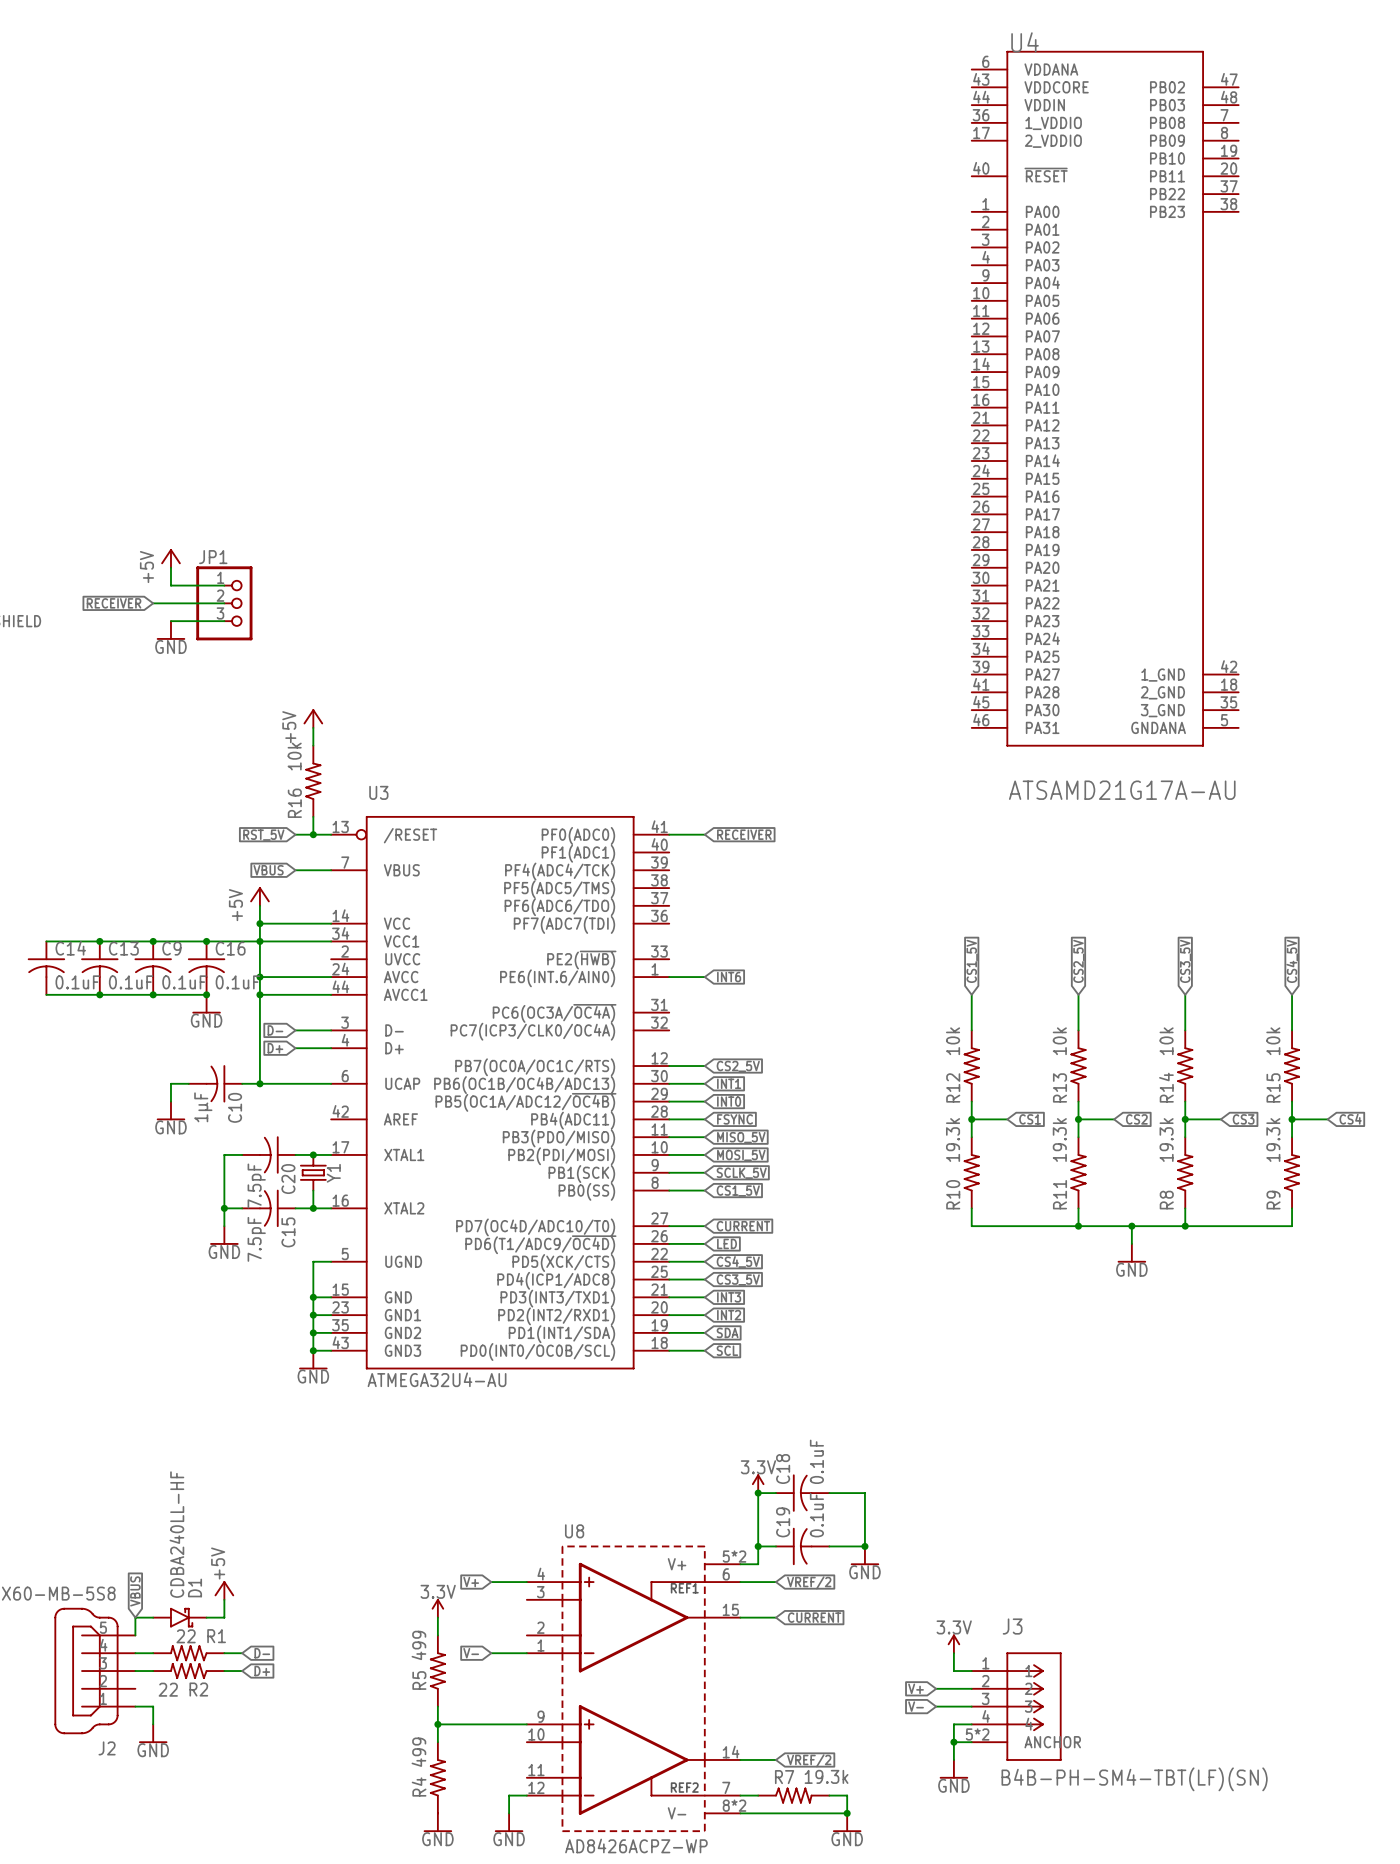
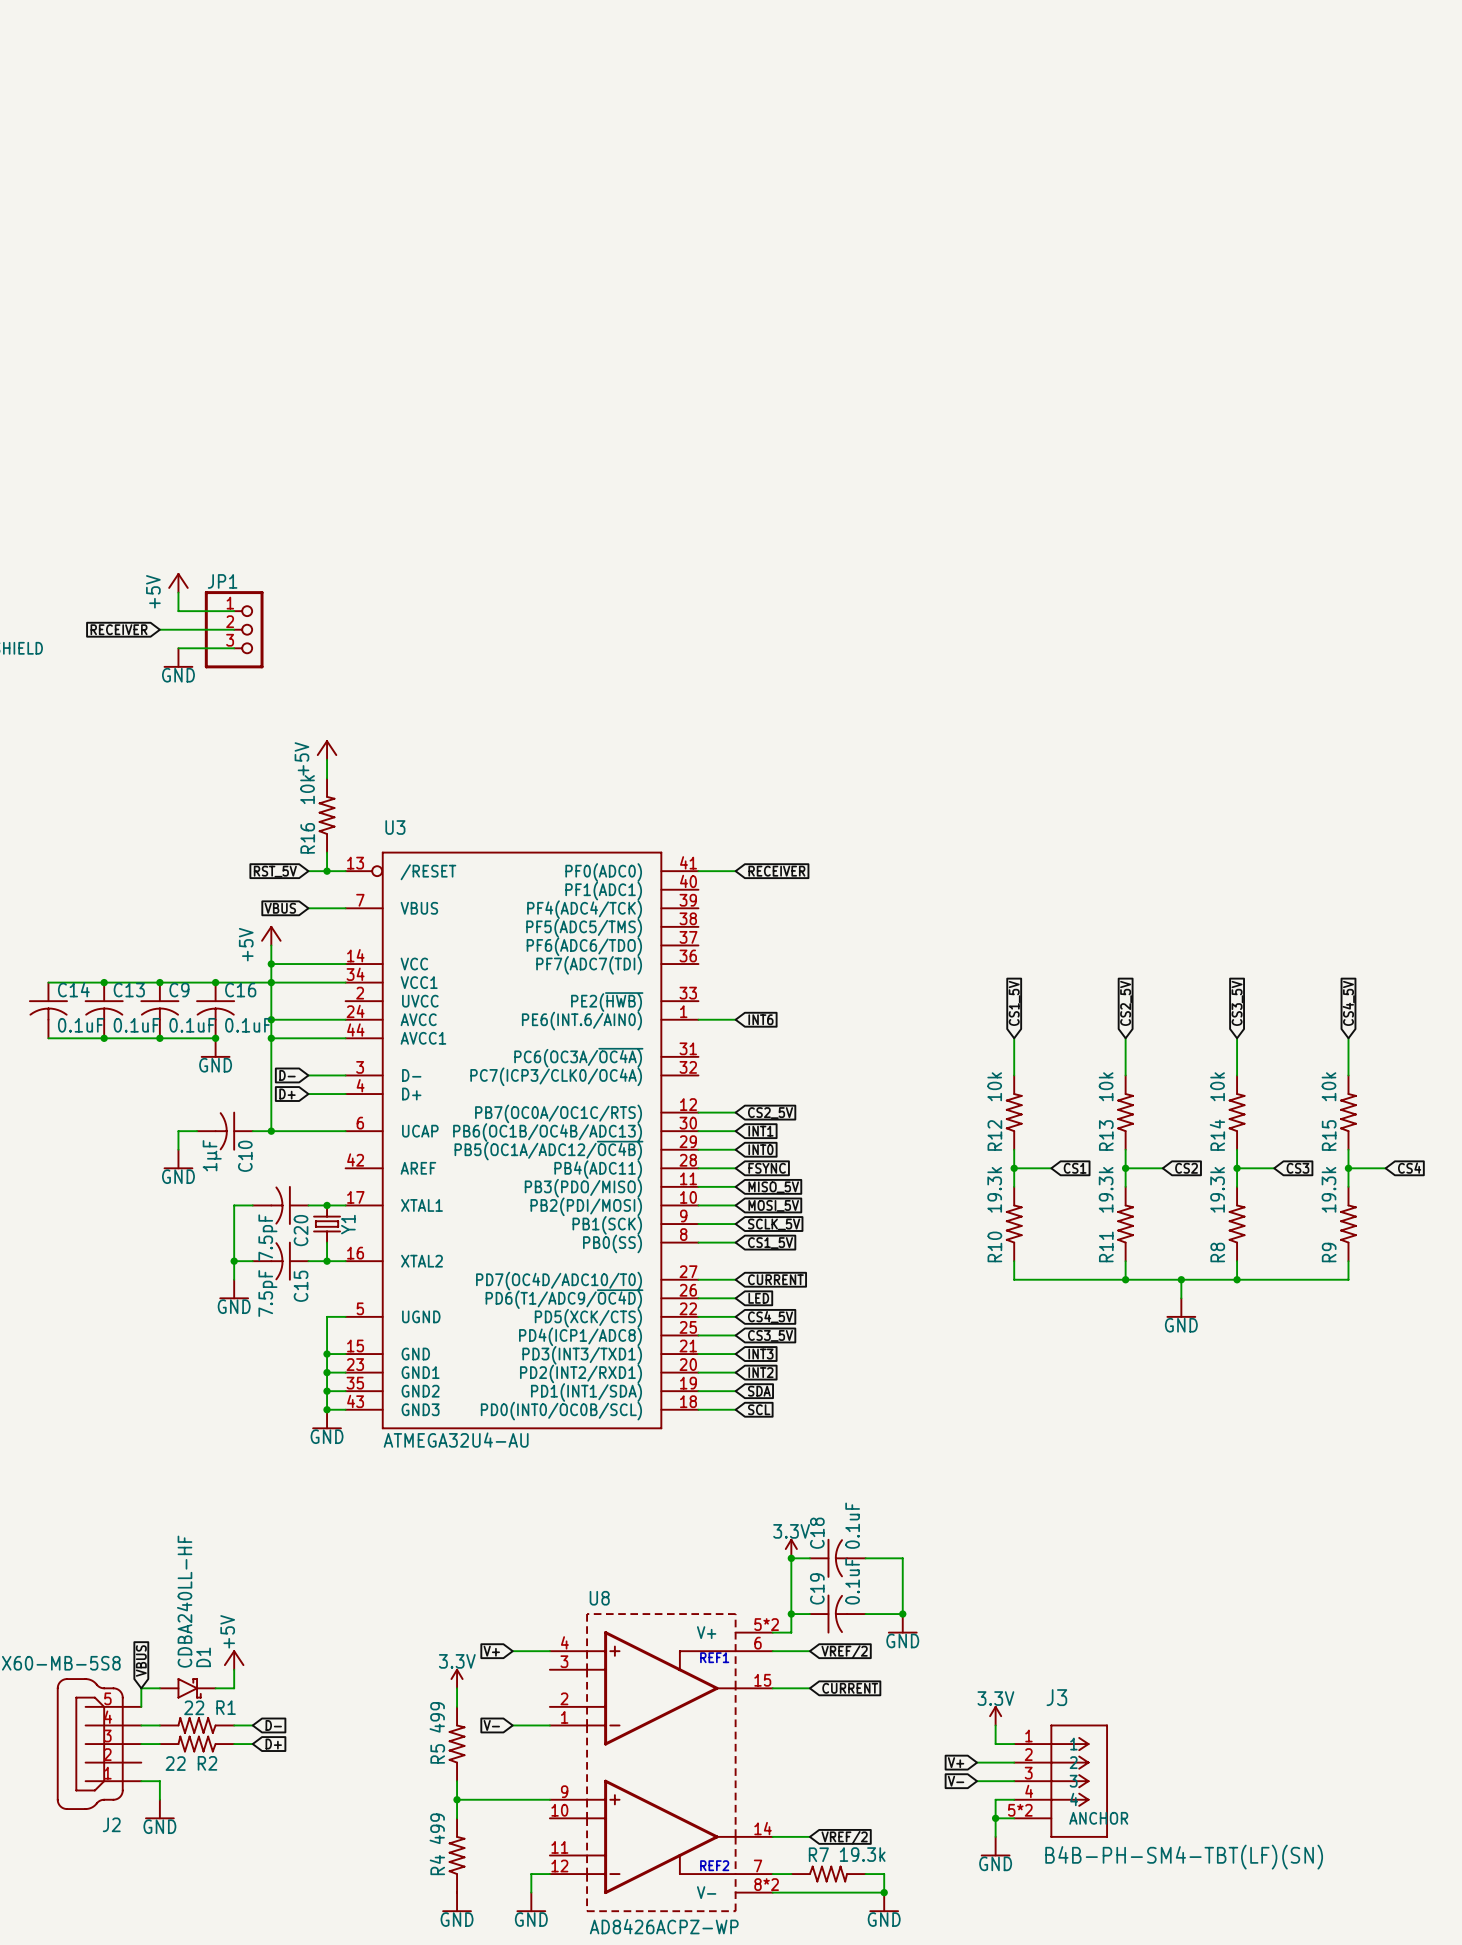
U4: (1105, 398) -> none

